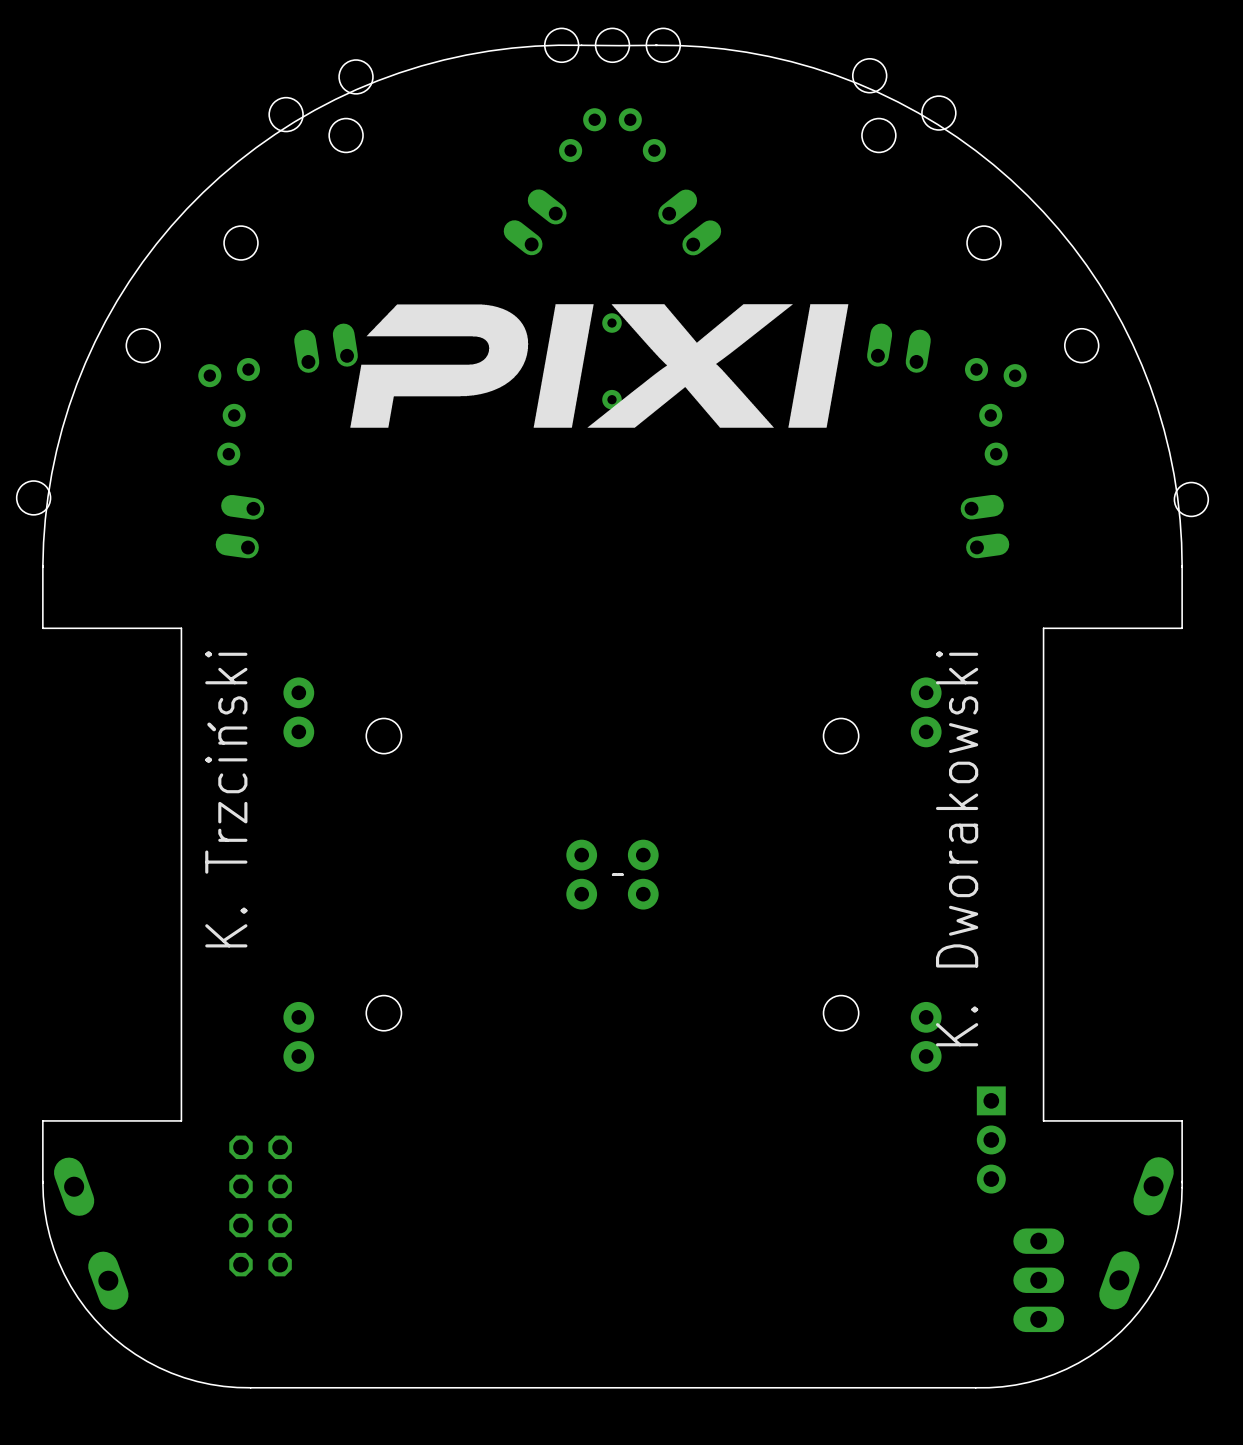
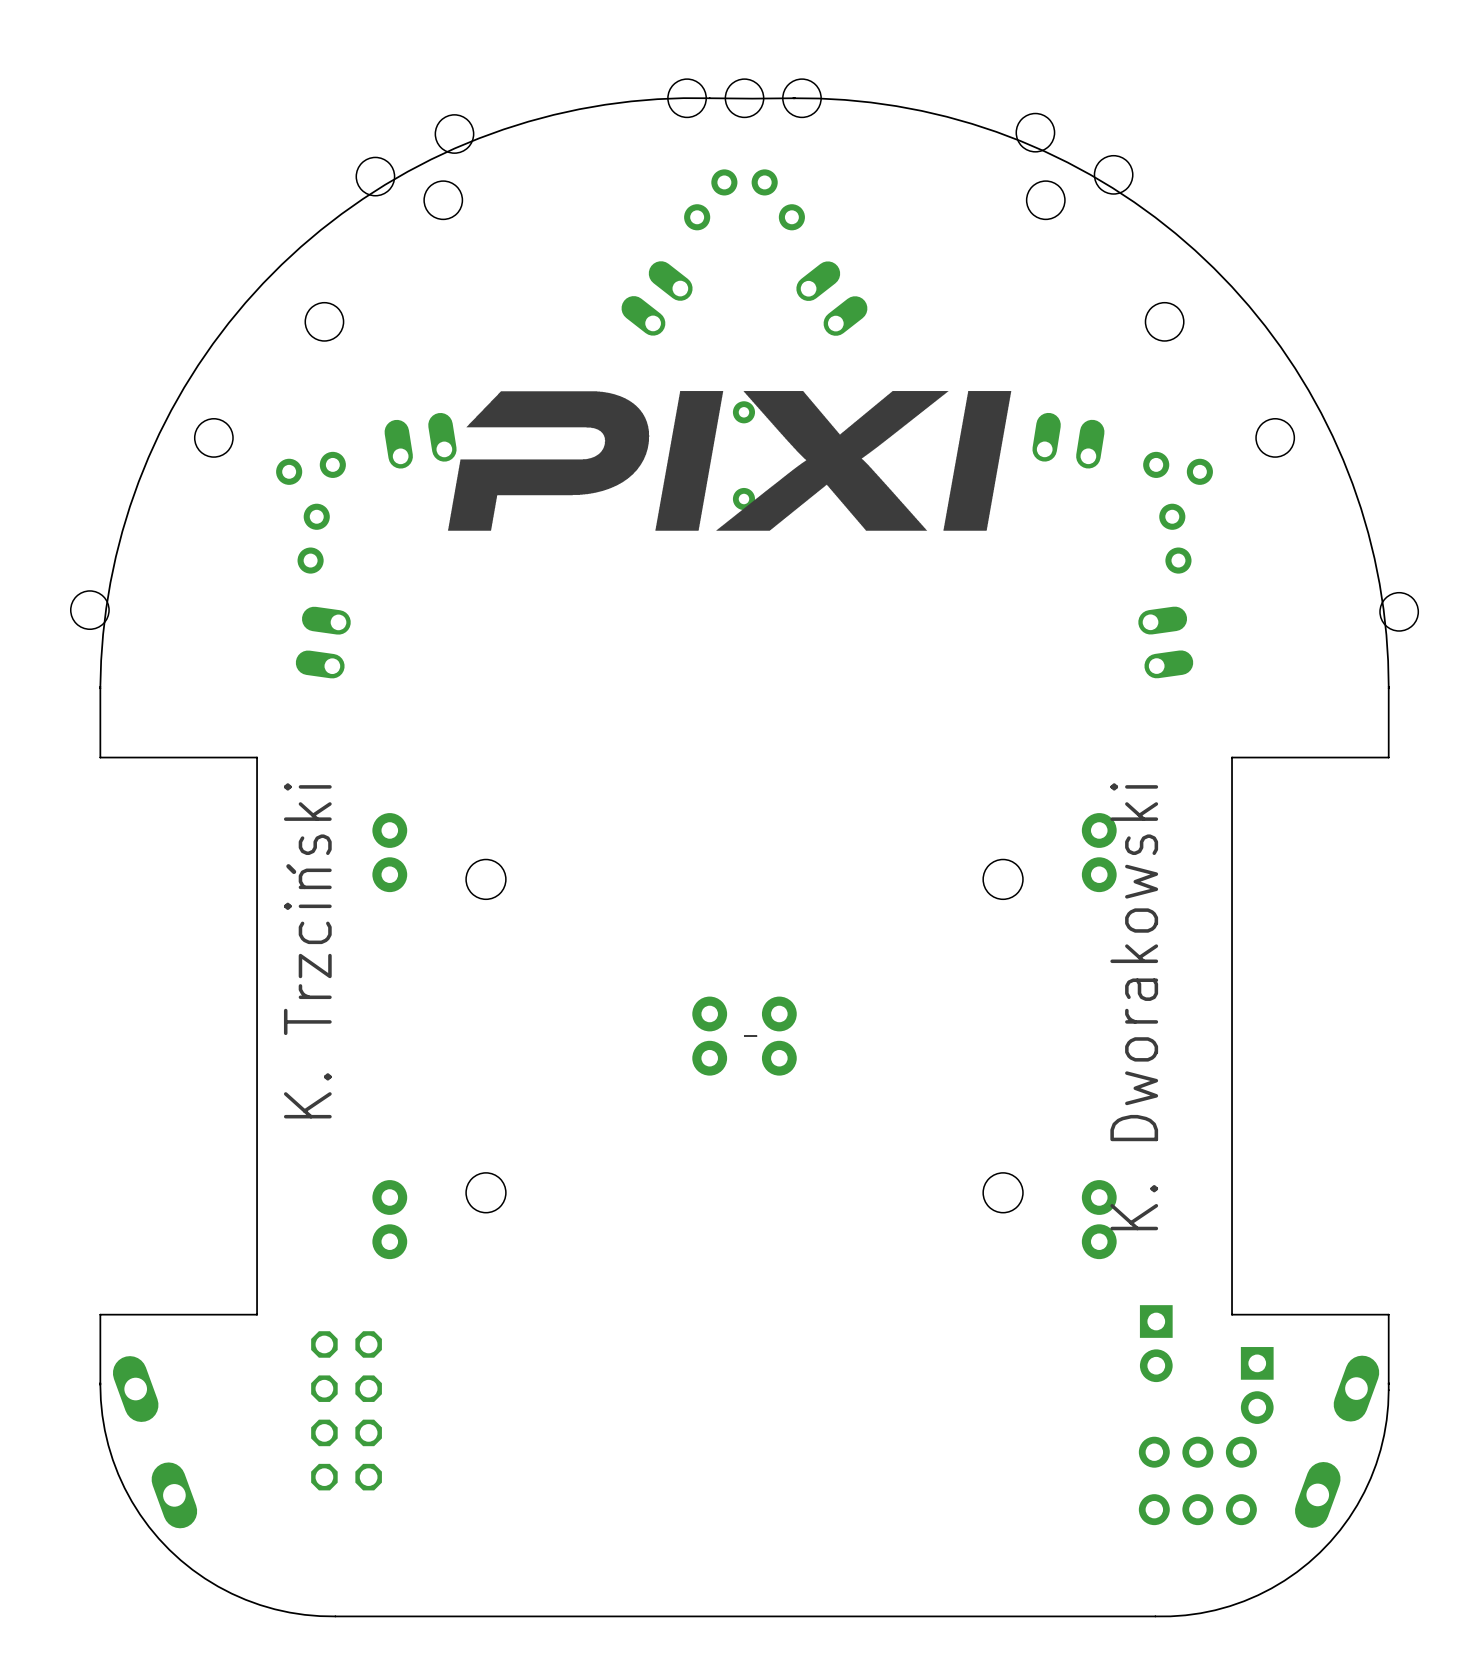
part: (991, 1139) -> none
part: none -> (1156, 1343)
part: none -> (1257, 1385)
part: none -> (1197, 1480)
part: (1038, 1280) -> none

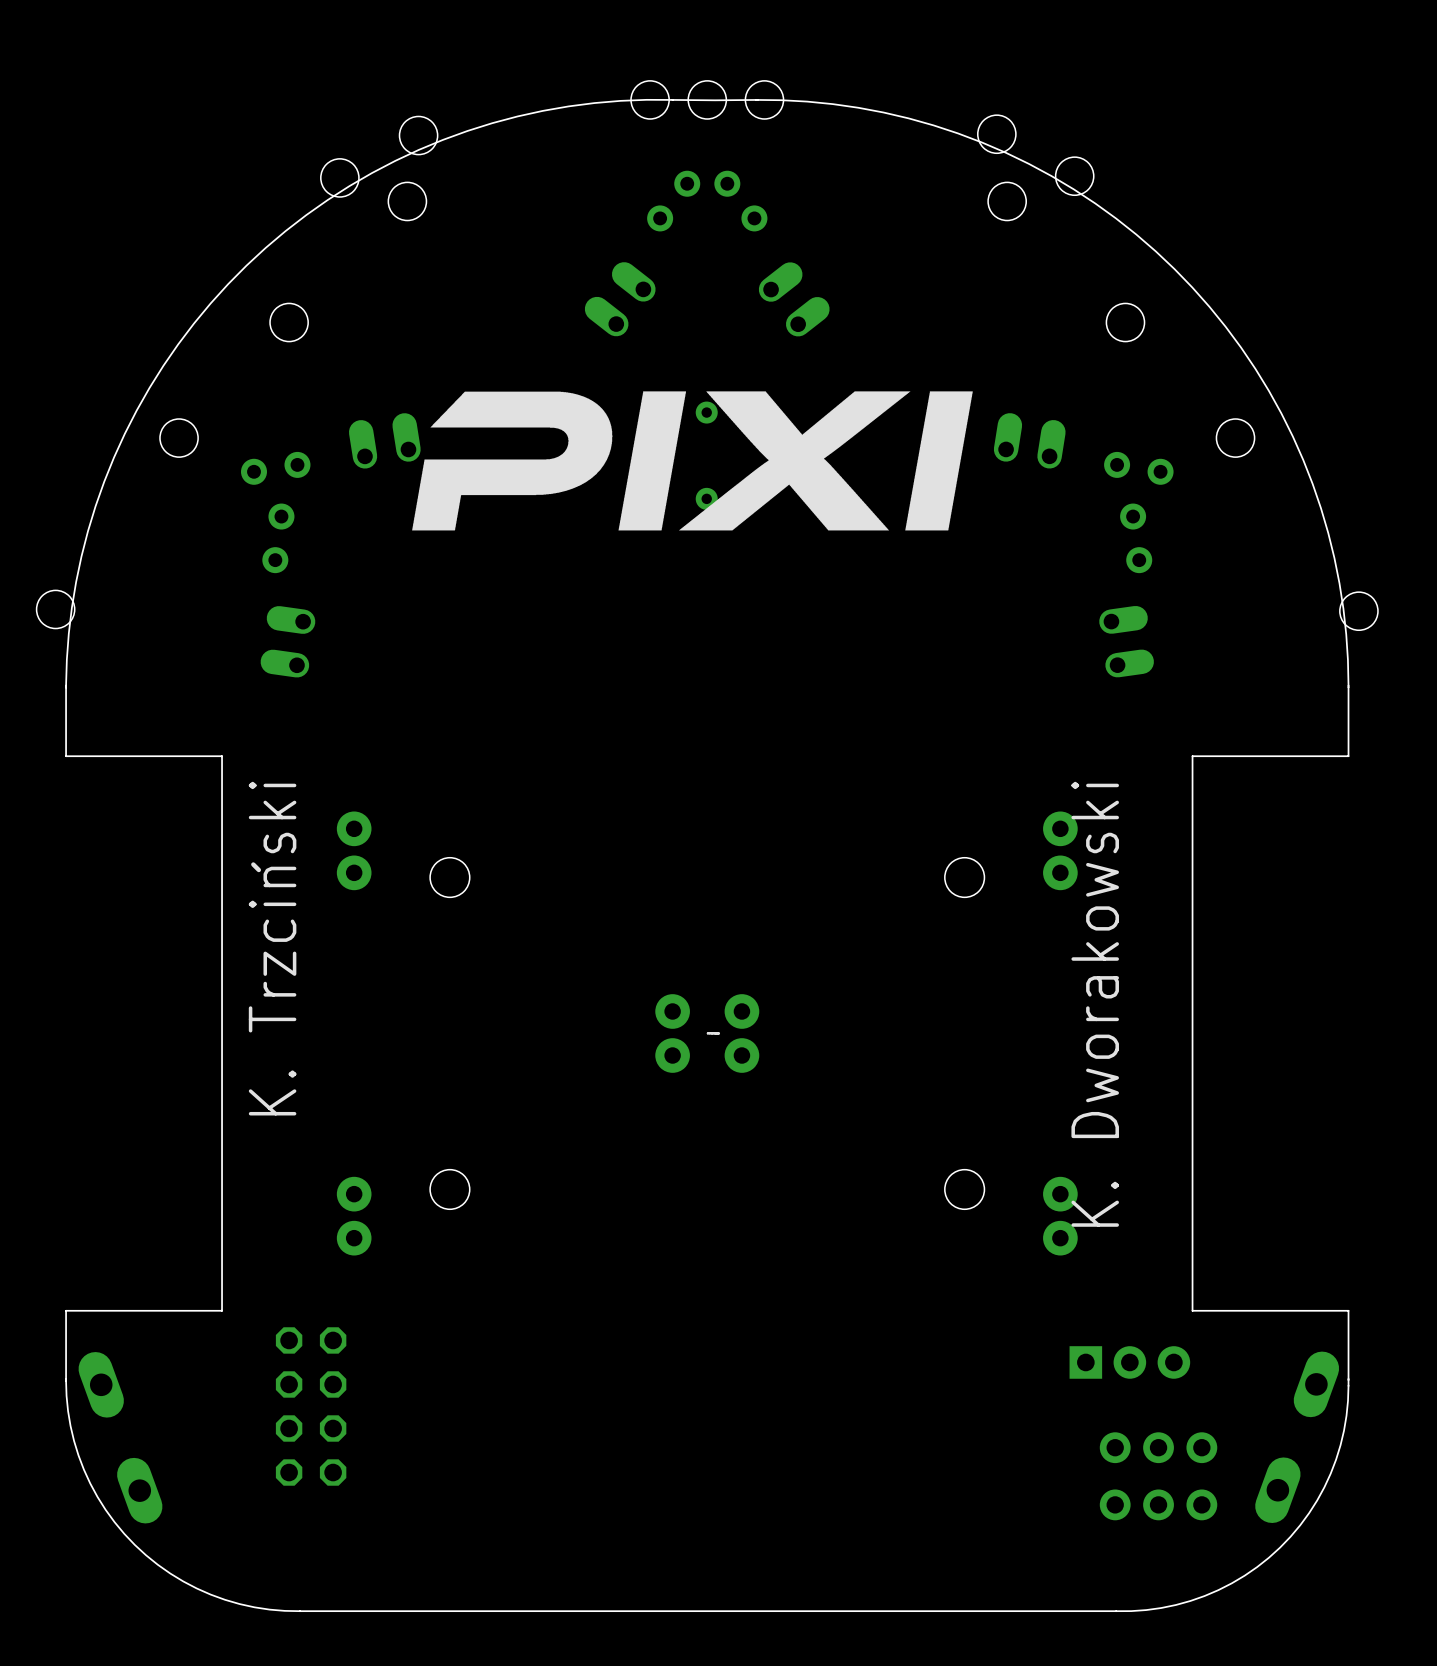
part: (1156, 1343) -> none
part: none -> (1129, 1362)
part: (1257, 1385) -> none

